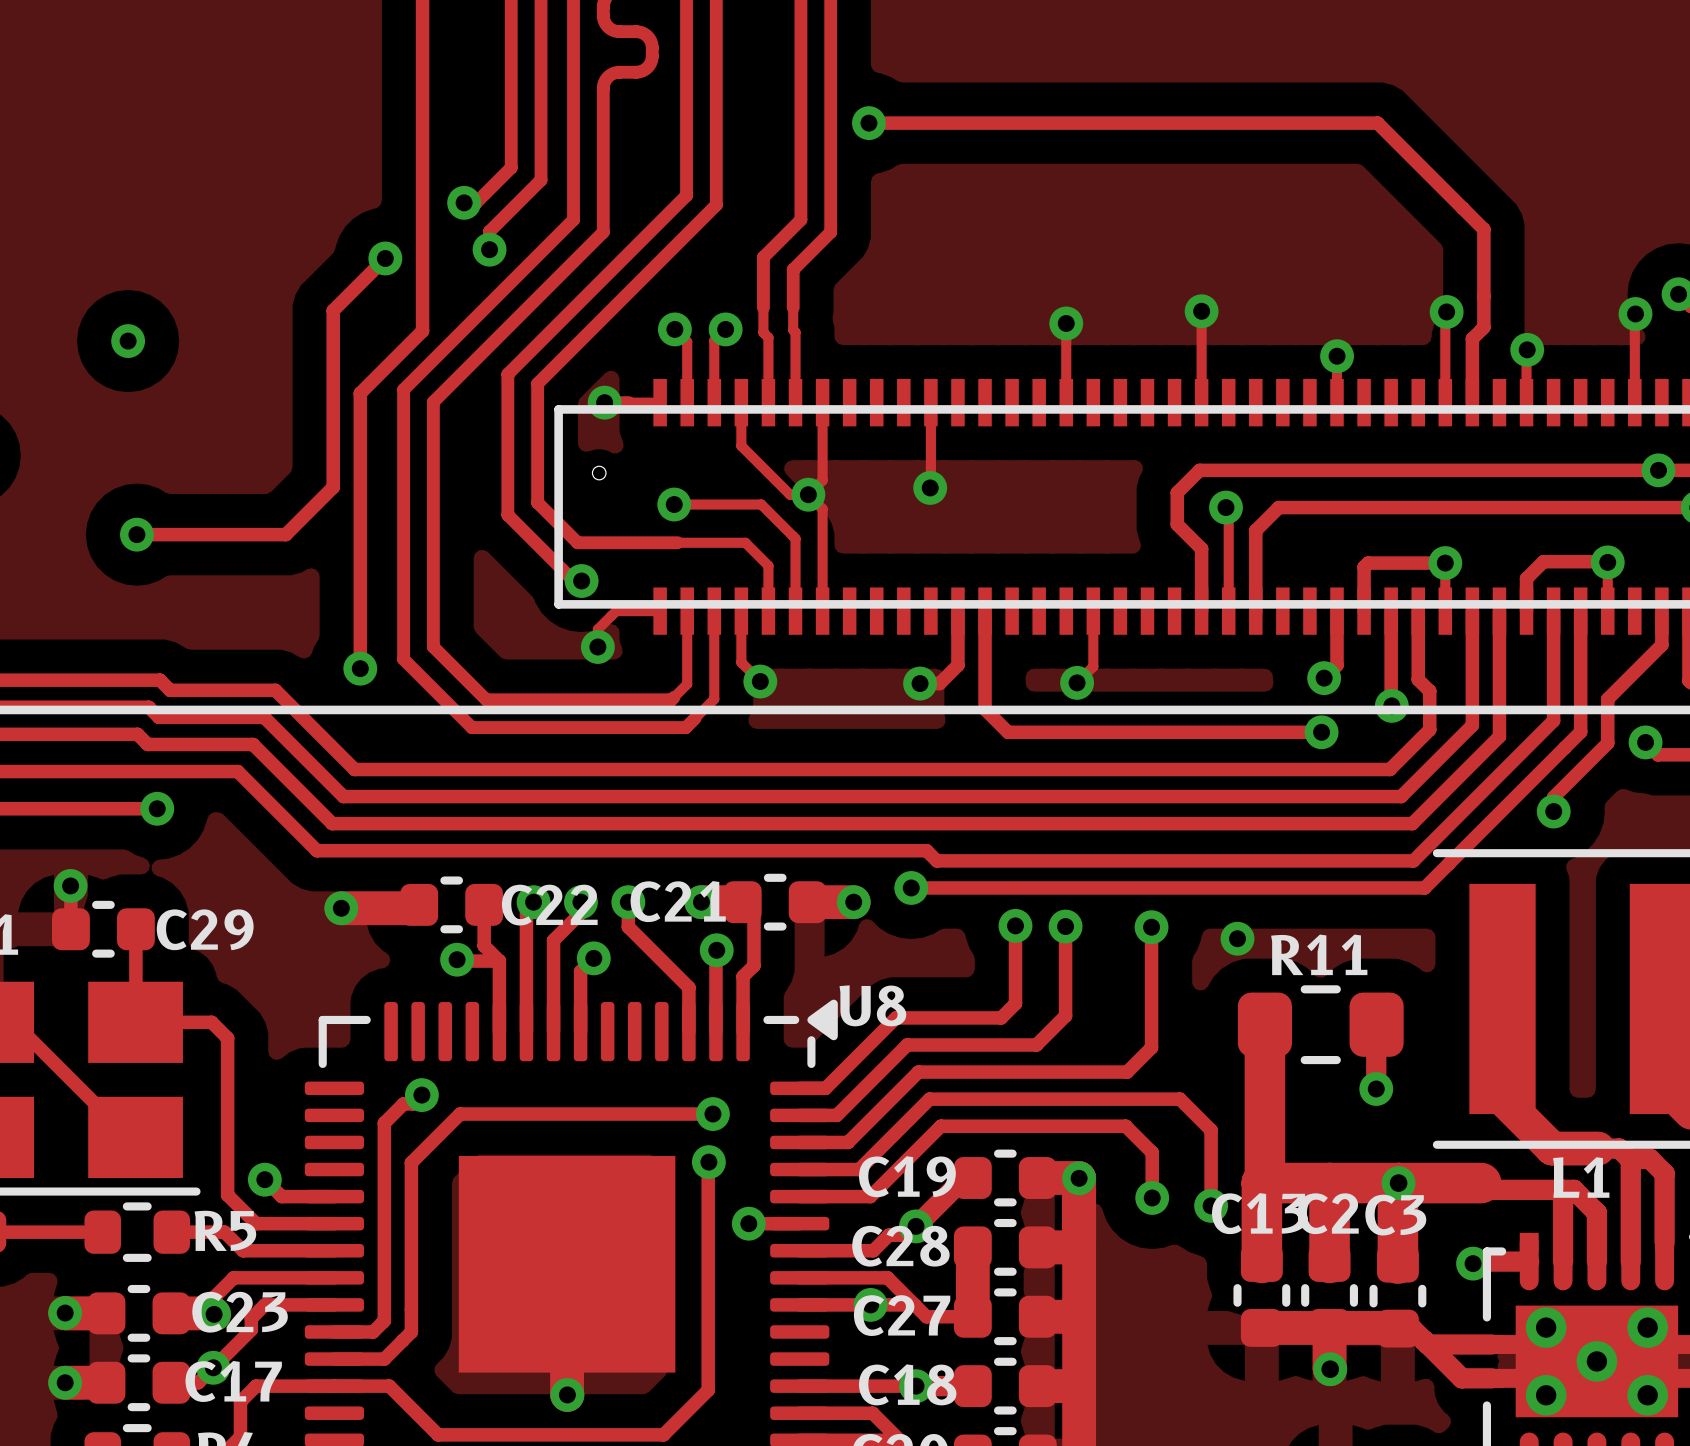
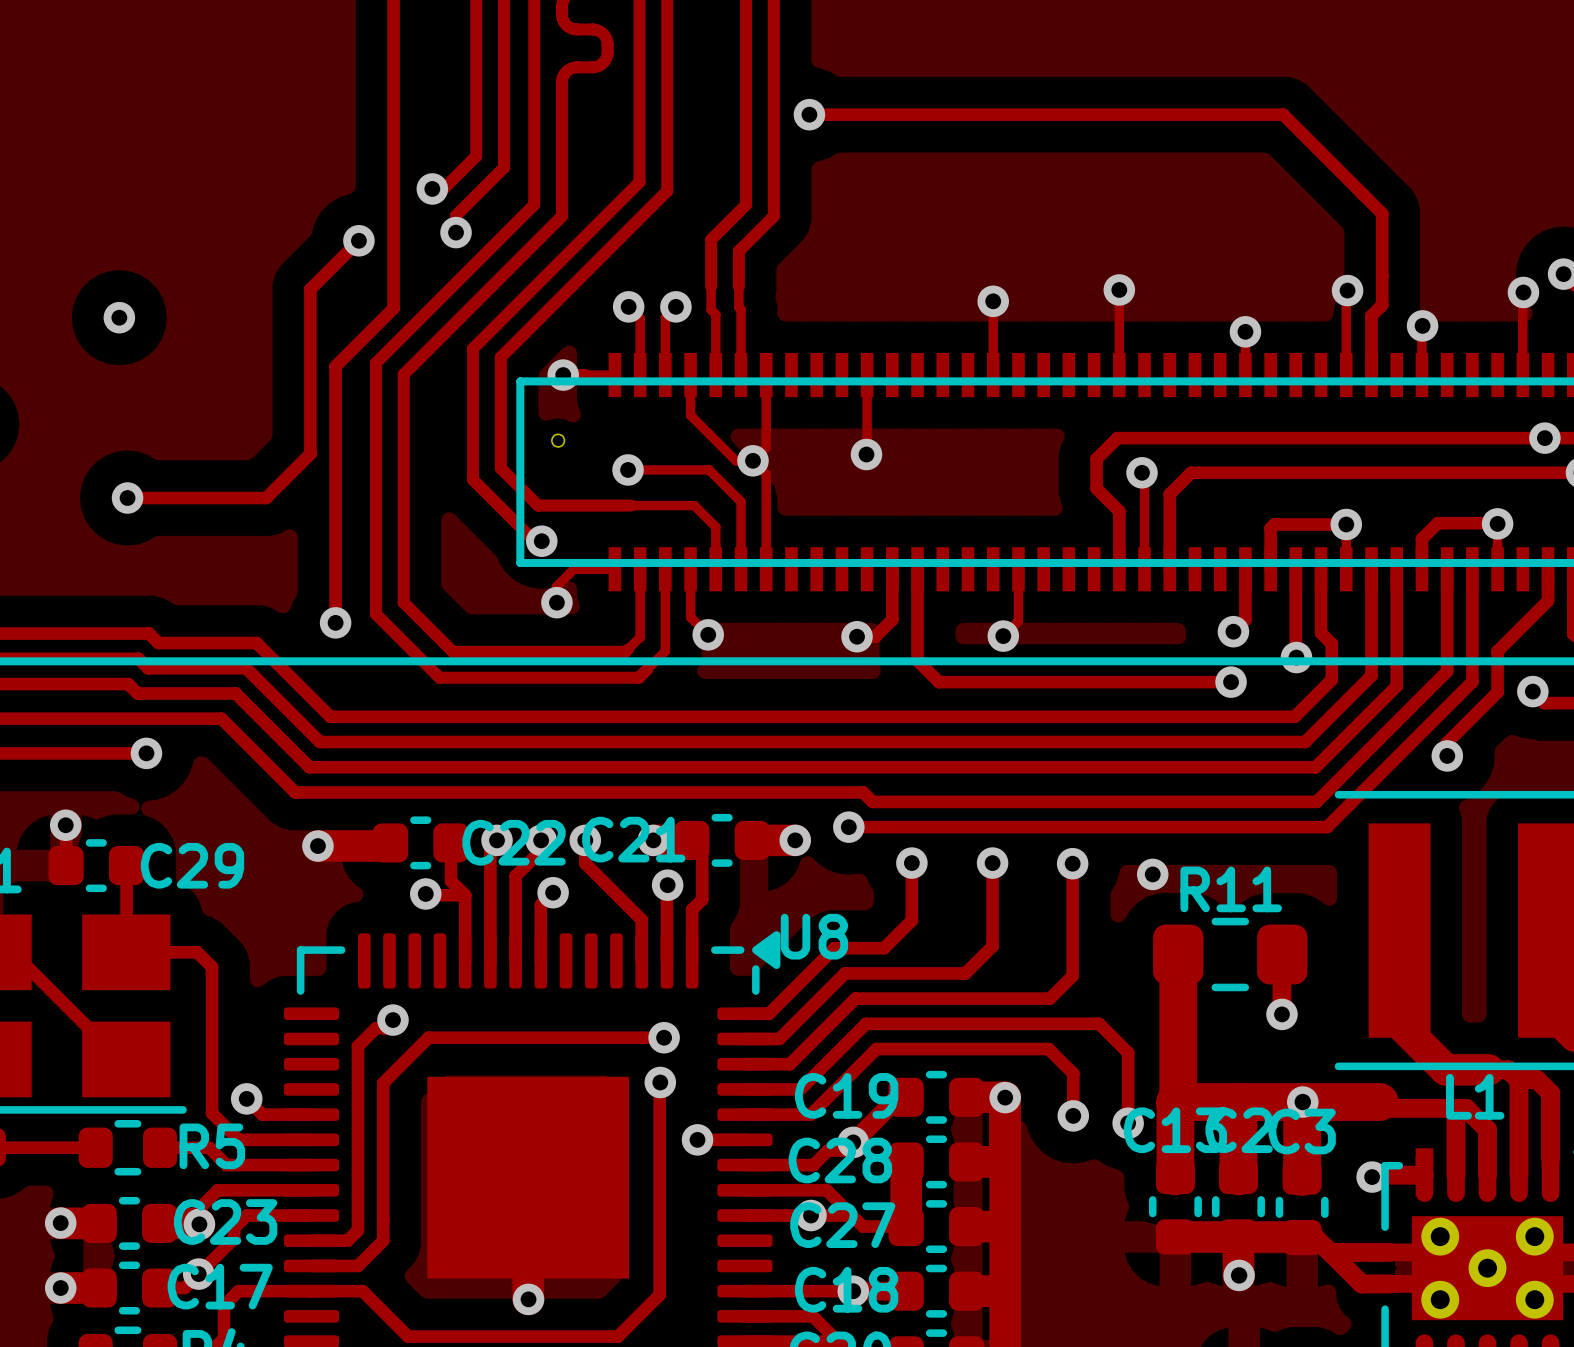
track: (1015, 925) (1015, 1003) (1001, 1017) (949, 1017) -> (911, 863) (911, 920) (884, 948)
via position: (1015, 925) -> (911, 863)

